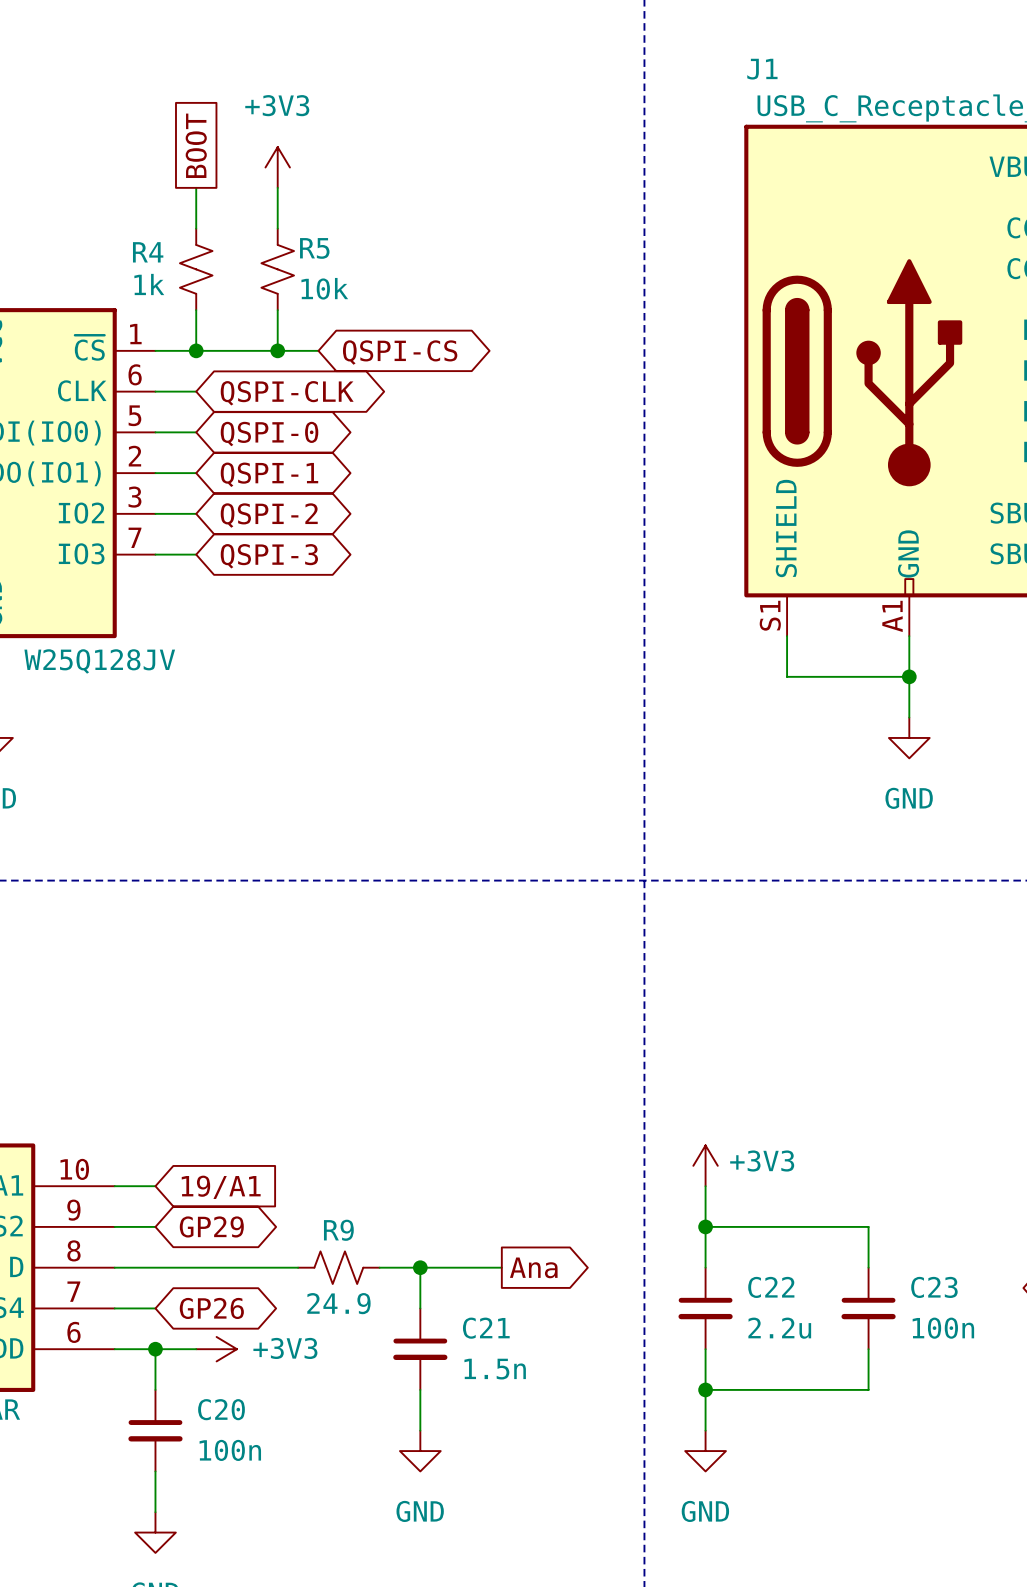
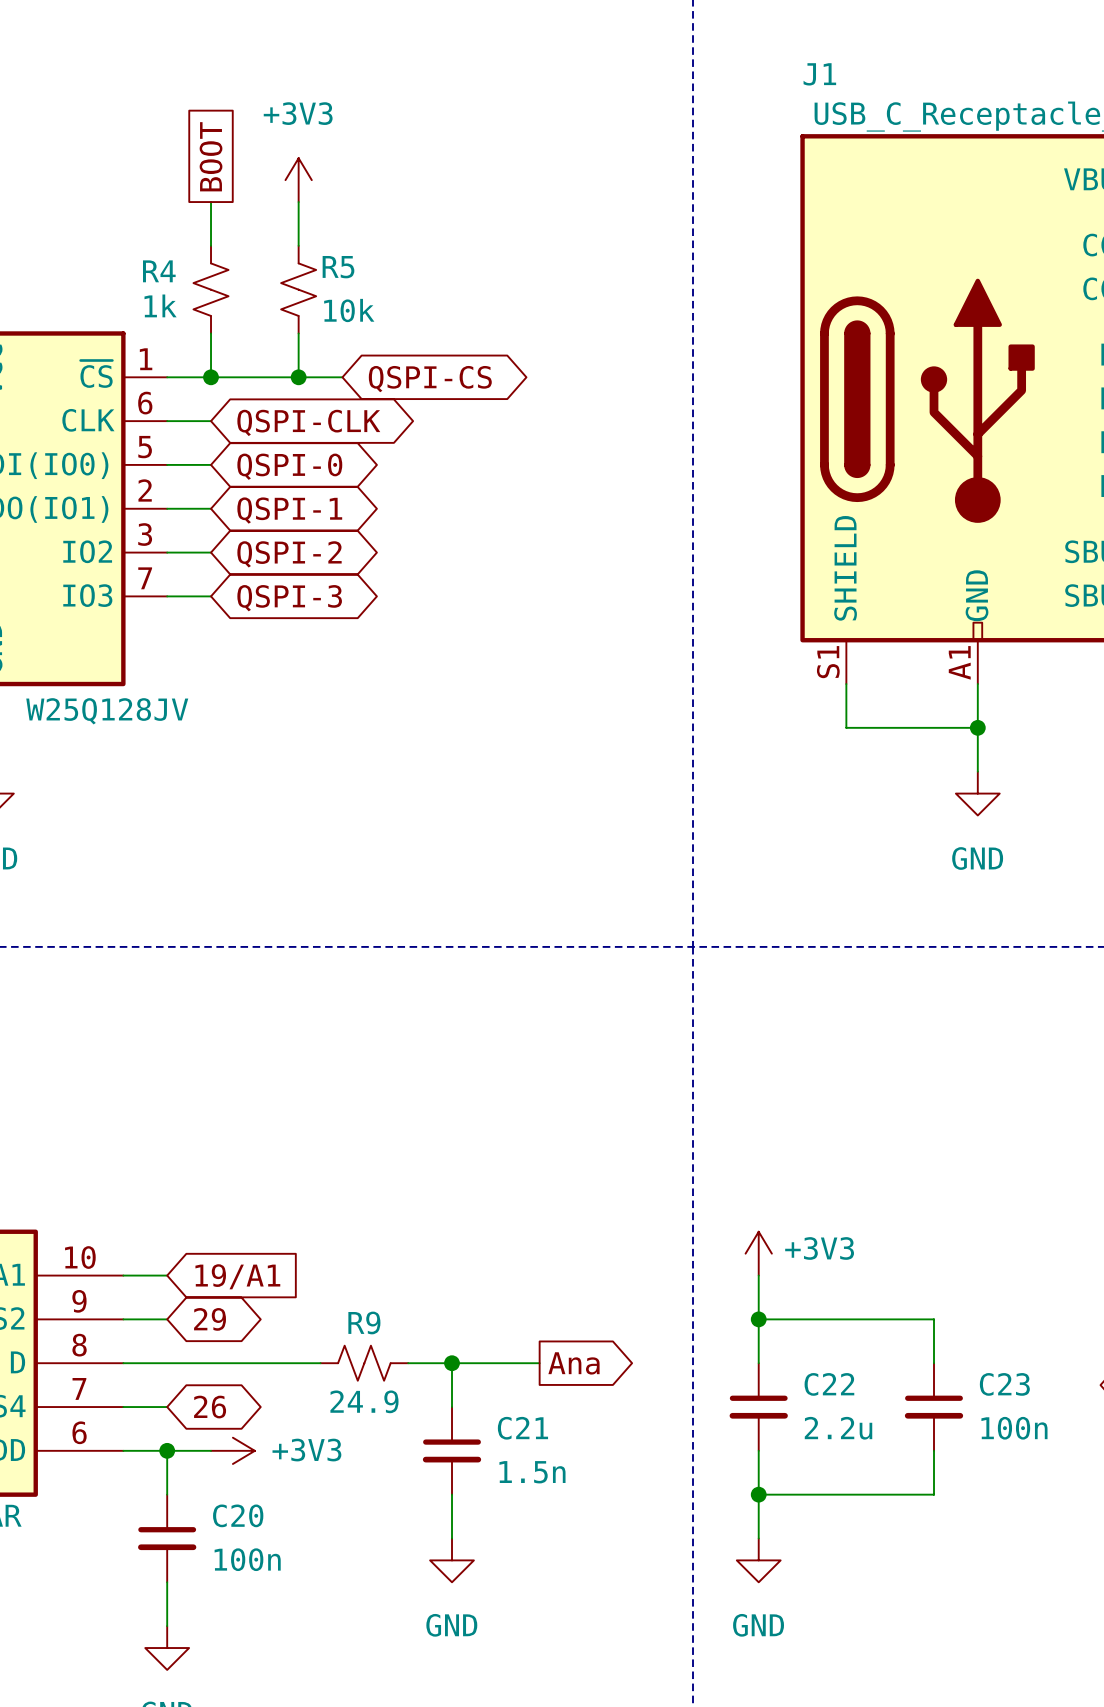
global label: GP29 (211, 1226) -> 29 (210, 1319)
global label: GP26 (211, 1308) -> 26 (210, 1407)

